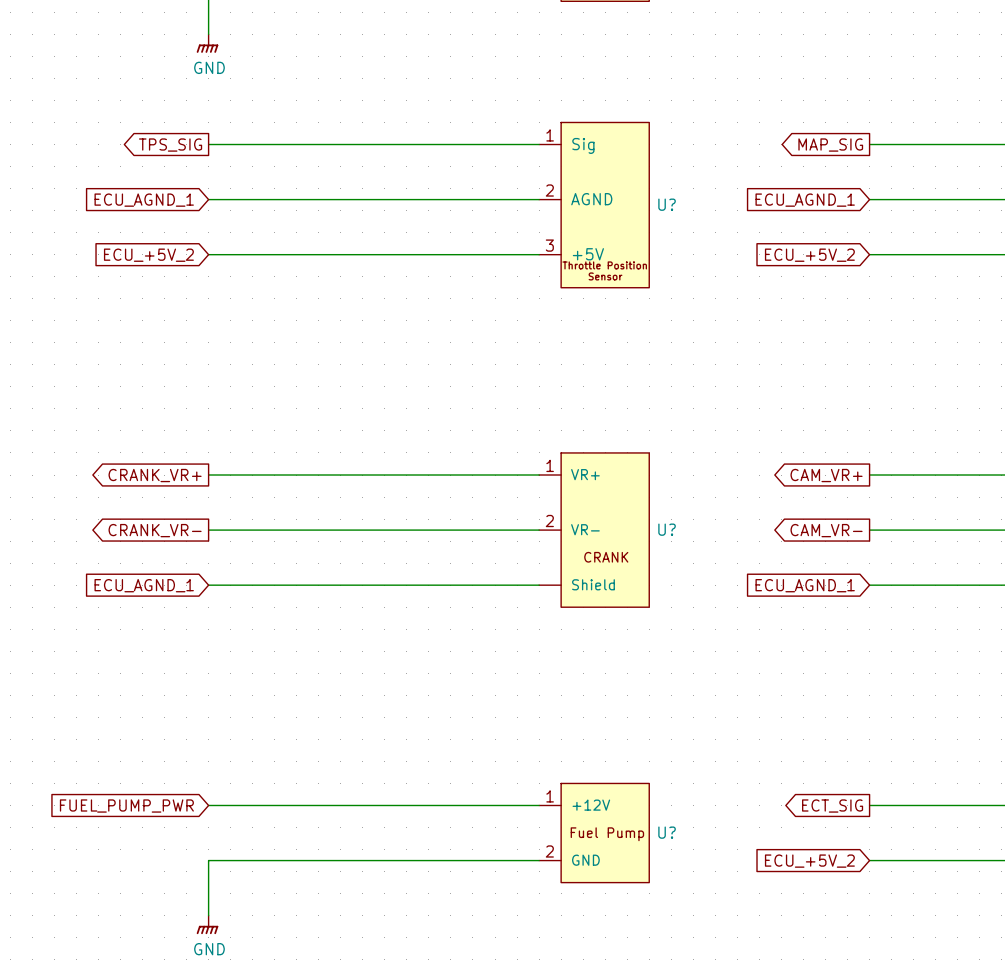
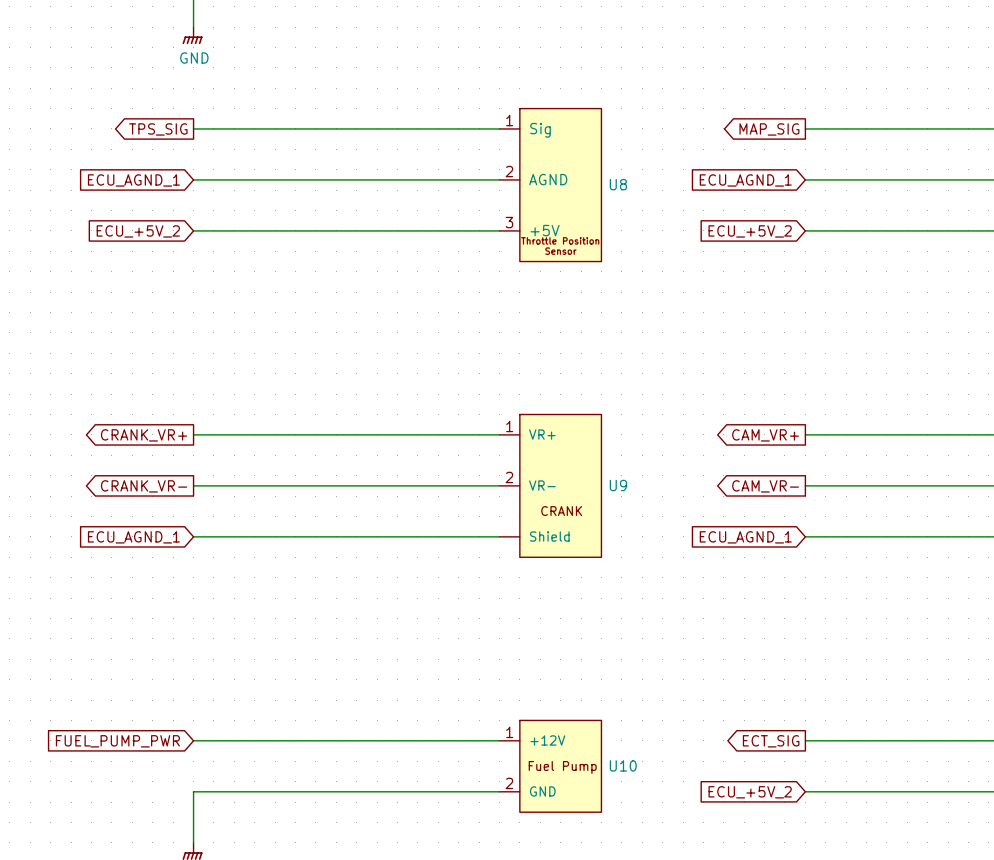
U? name: U? (667, 204) -> U8 (618, 184)
U? name: U? (667, 529) -> U9 (618, 485)
U? name: U? (667, 832) -> U10 (623, 765)

